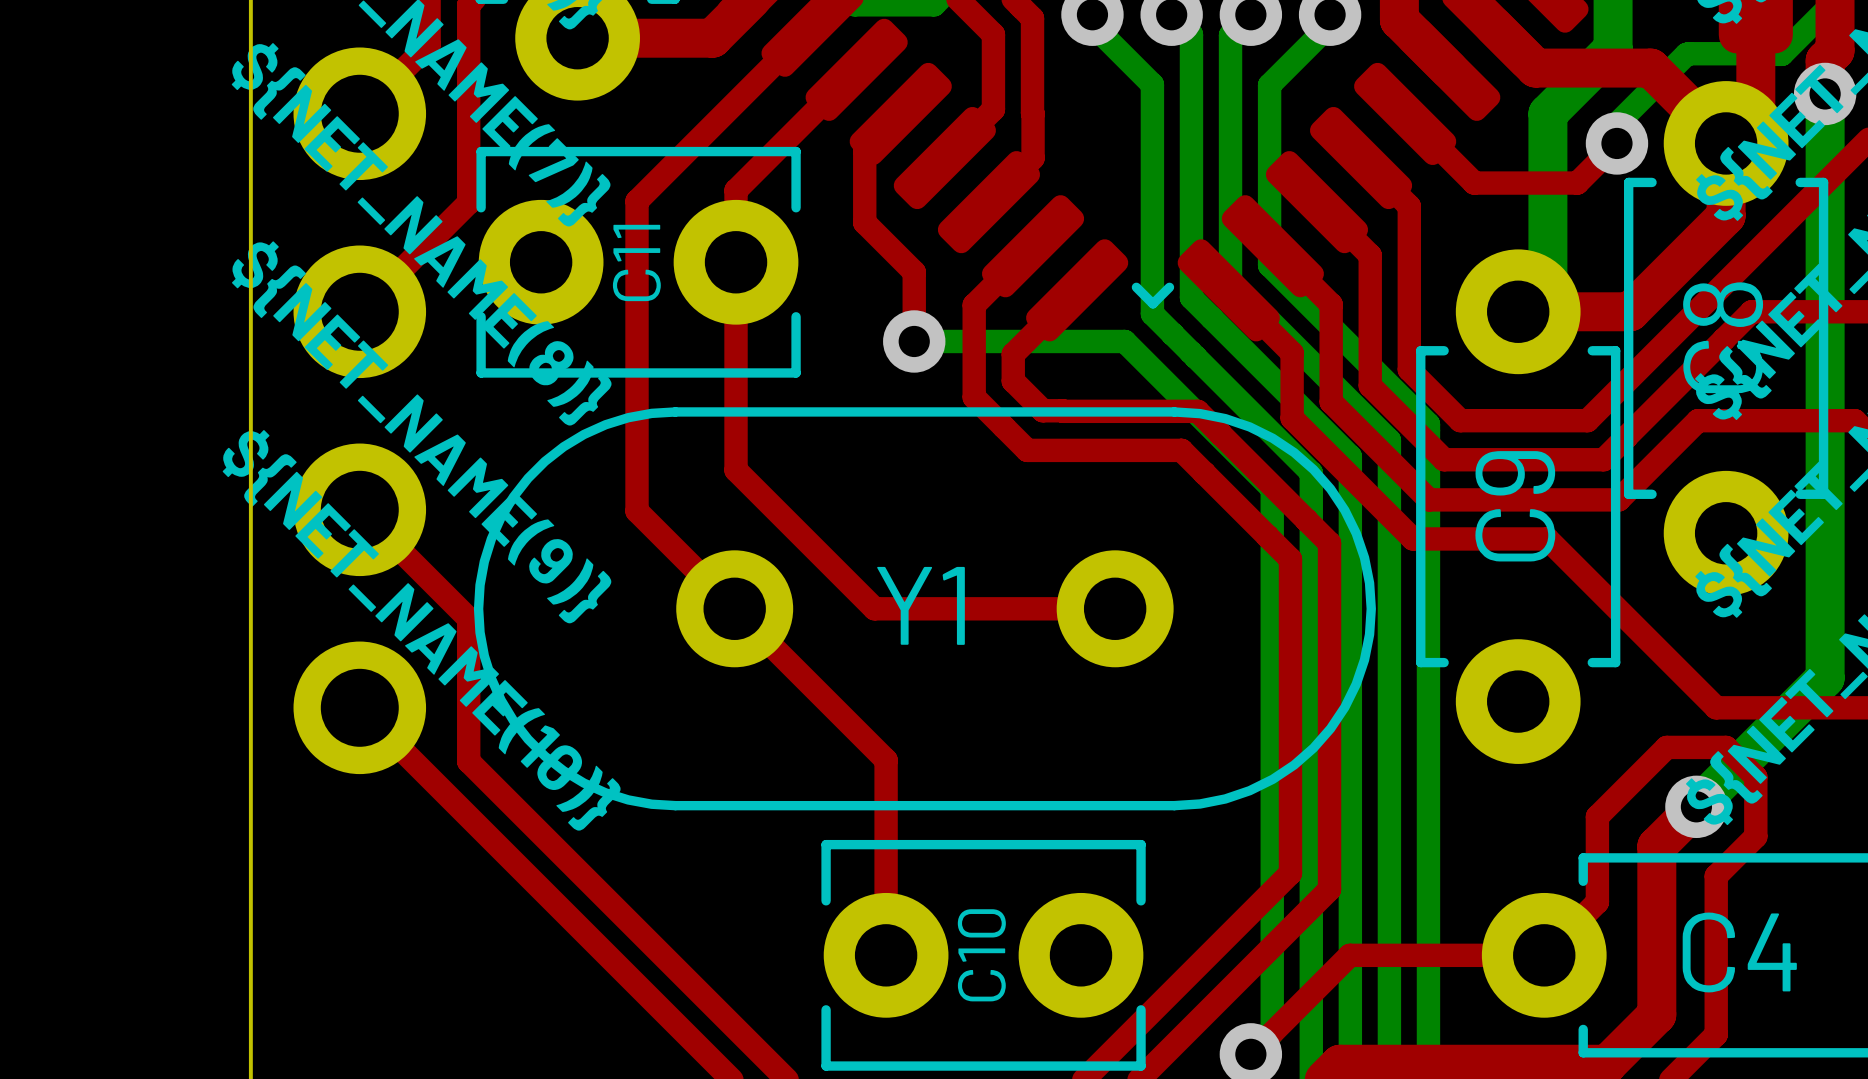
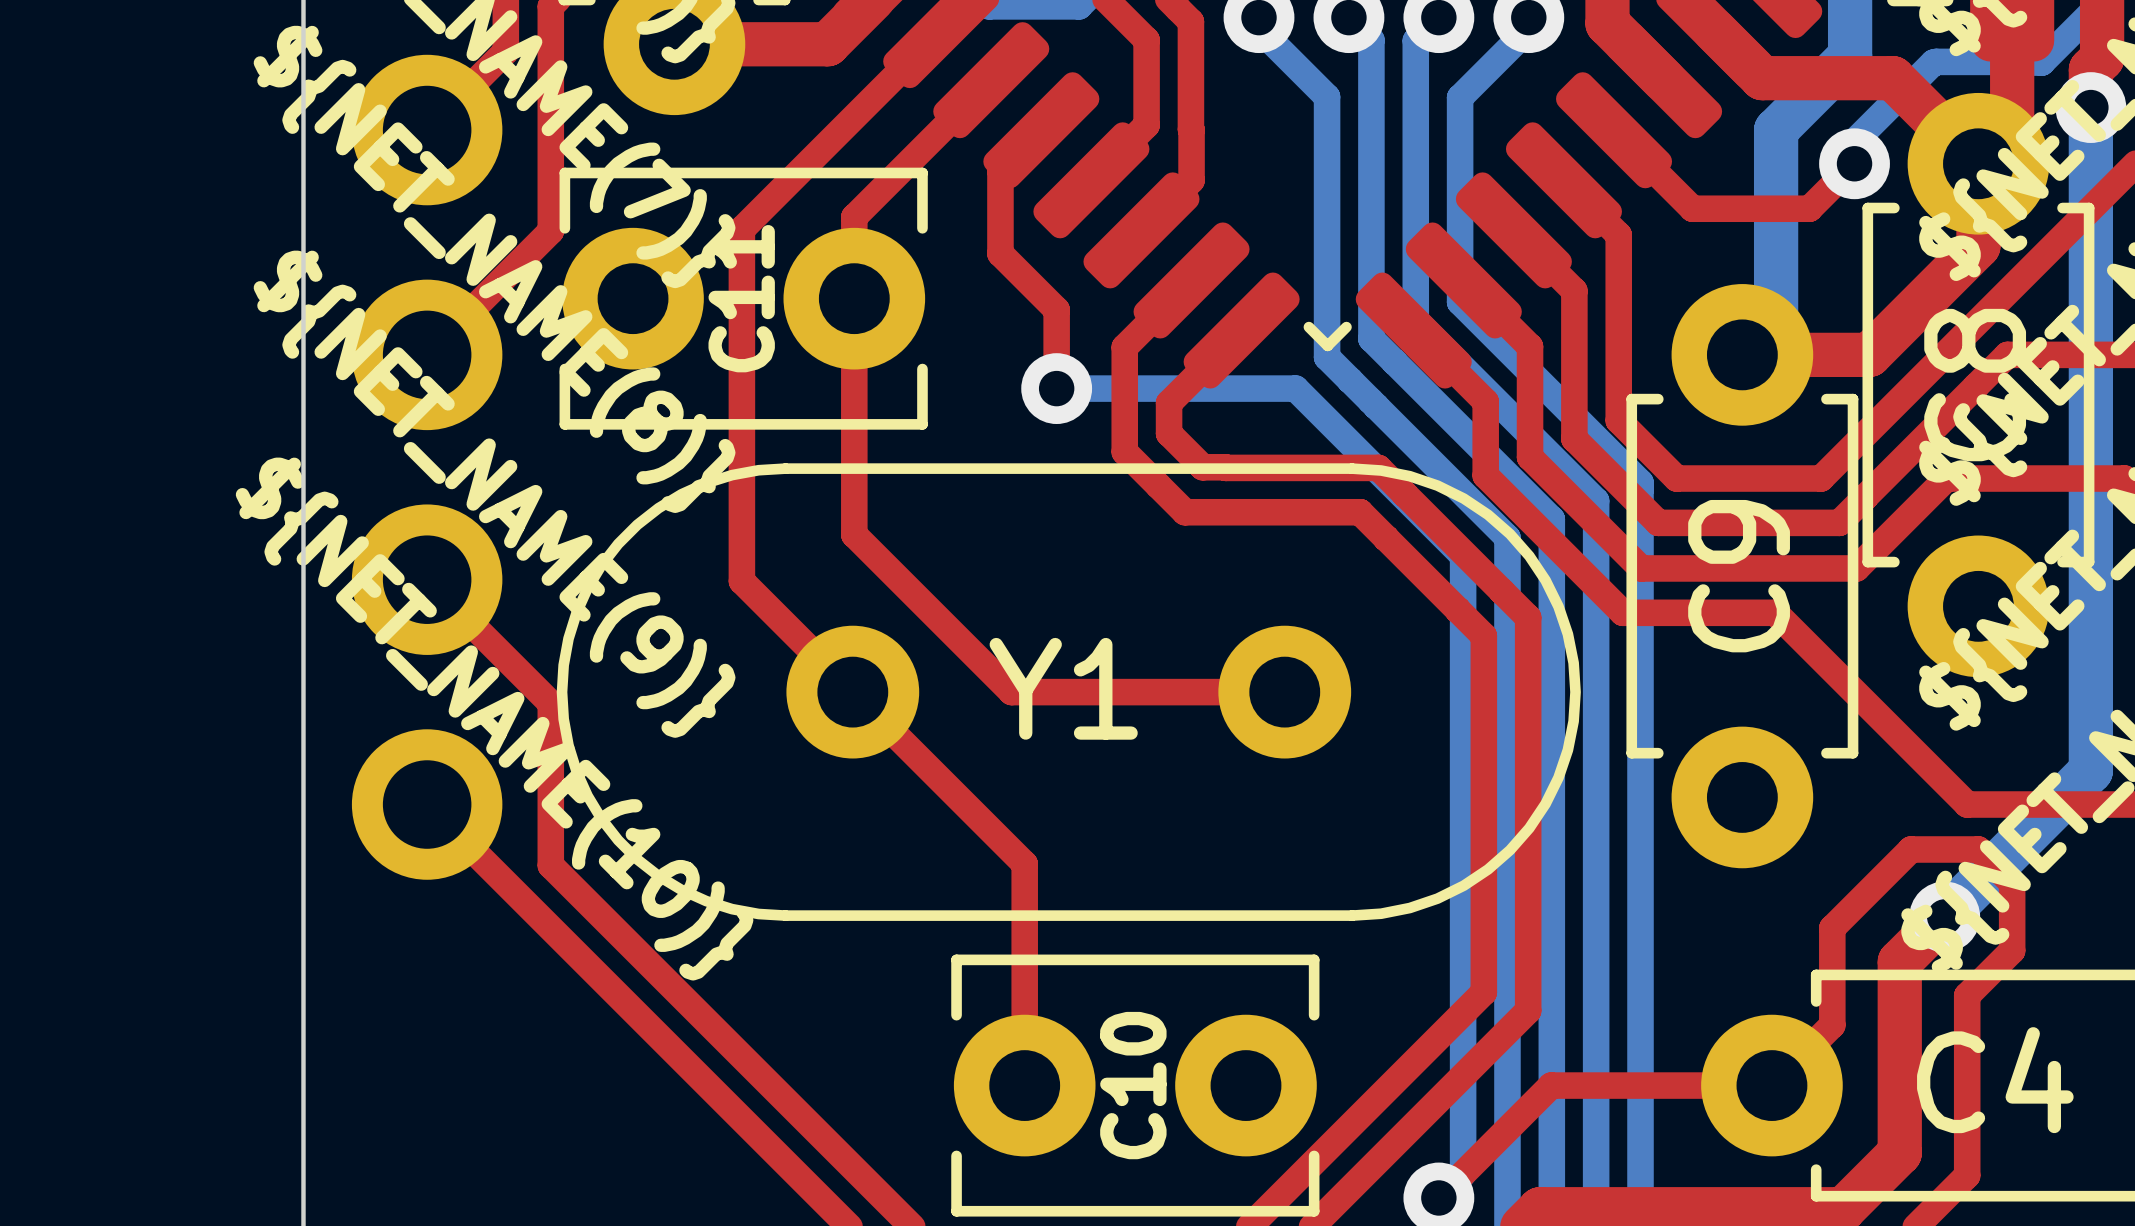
C11 footprint: [476, 146, 801, 378] -> [559, 167, 928, 430]
C10 footprint: [821, 839, 1146, 1071] -> [951, 954, 1320, 1217]

